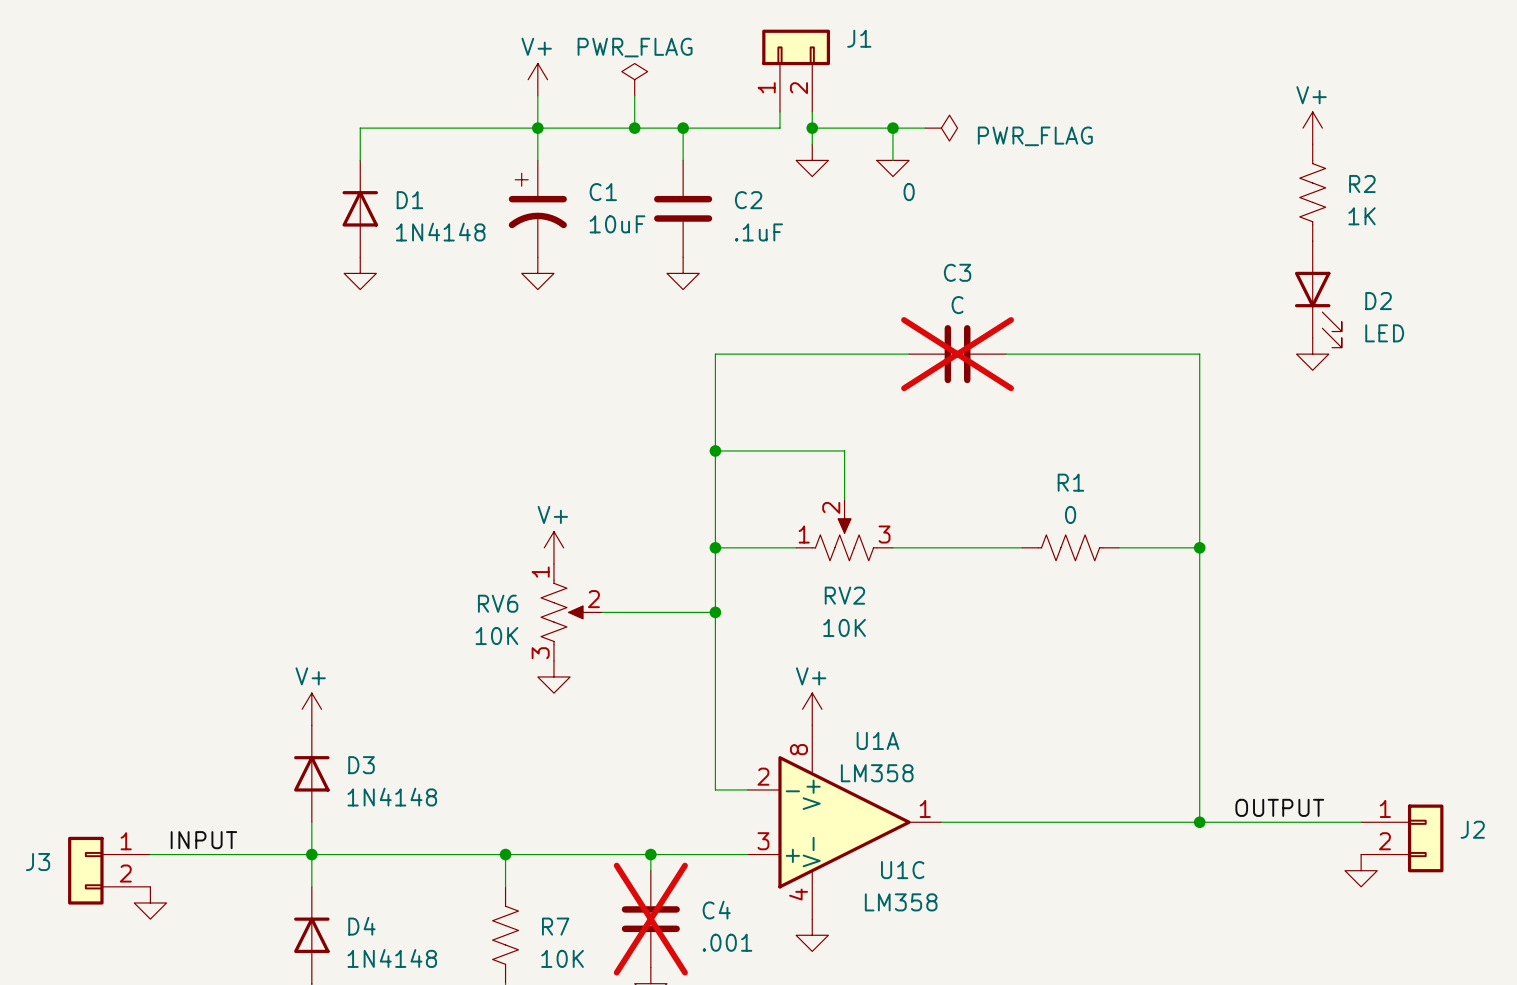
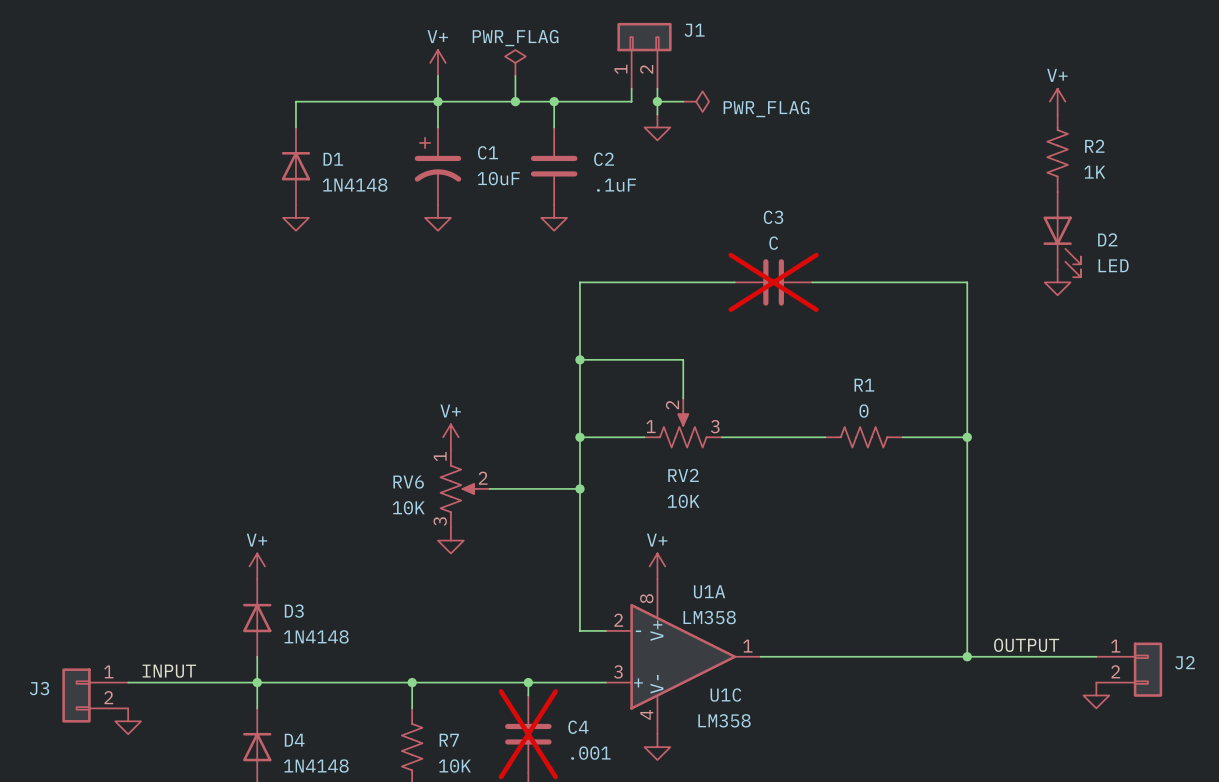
wire: (844, 128) (925, 128) -> none
wire: (892, 128) (892, 160) -> none
junction: (892, 128) -> none
power symbol position: PWR_FLAG (941, 128) -> PWR_FLAG (696, 101)
power symbol: 0 (892, 168) -> none

